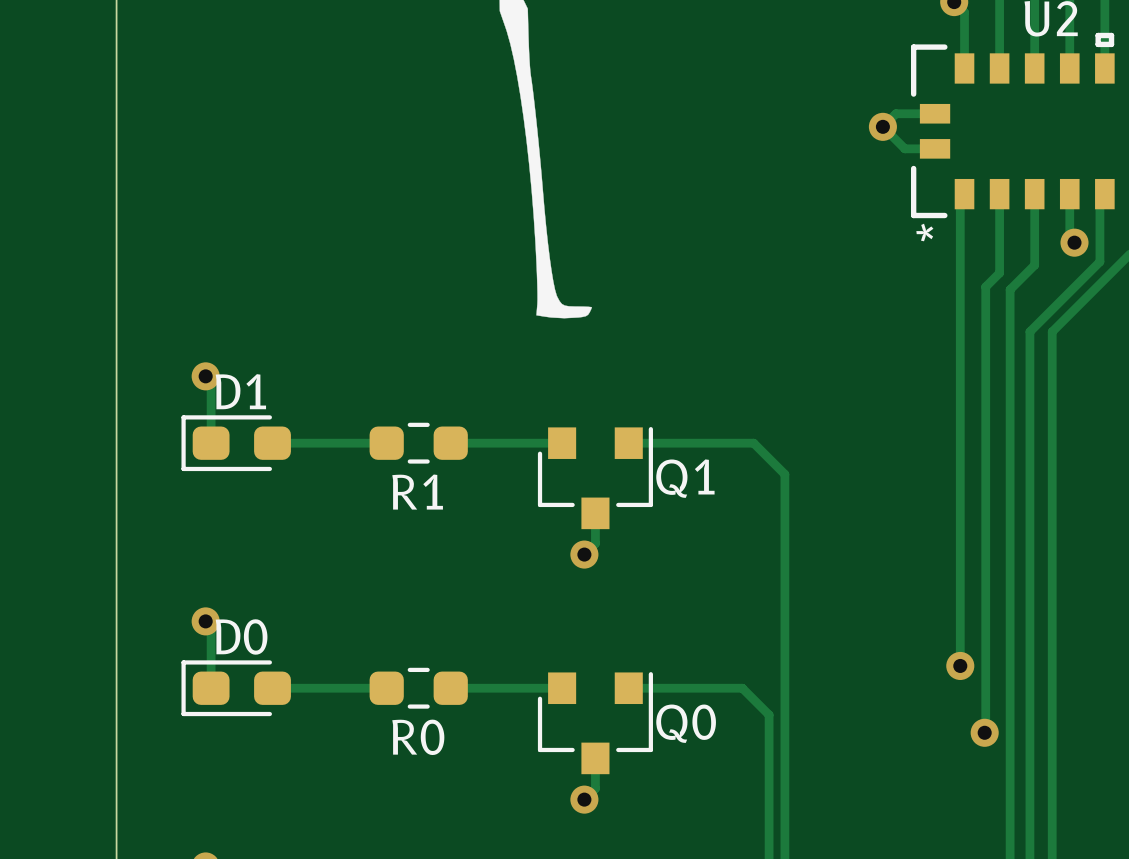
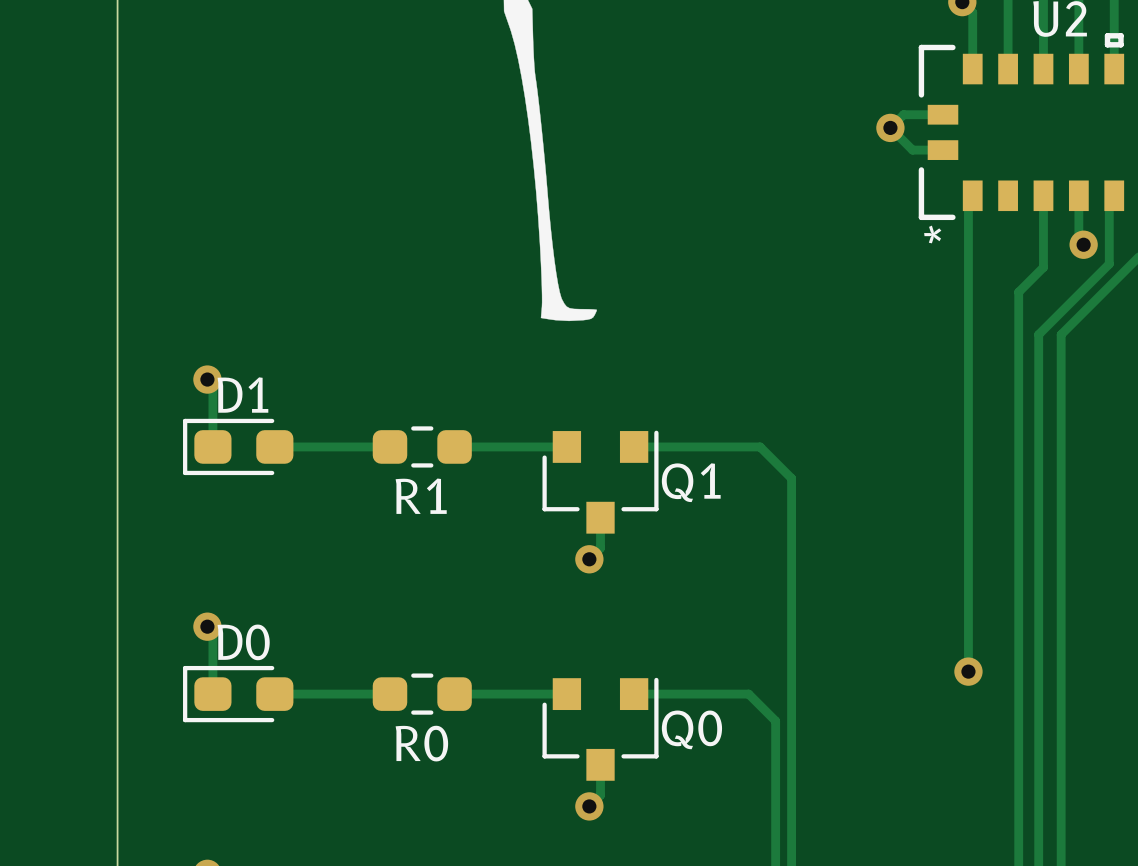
track: (999, 194) (999, 273) (985, 286) (984, 732) -> none
via: (984, 732) -> none

